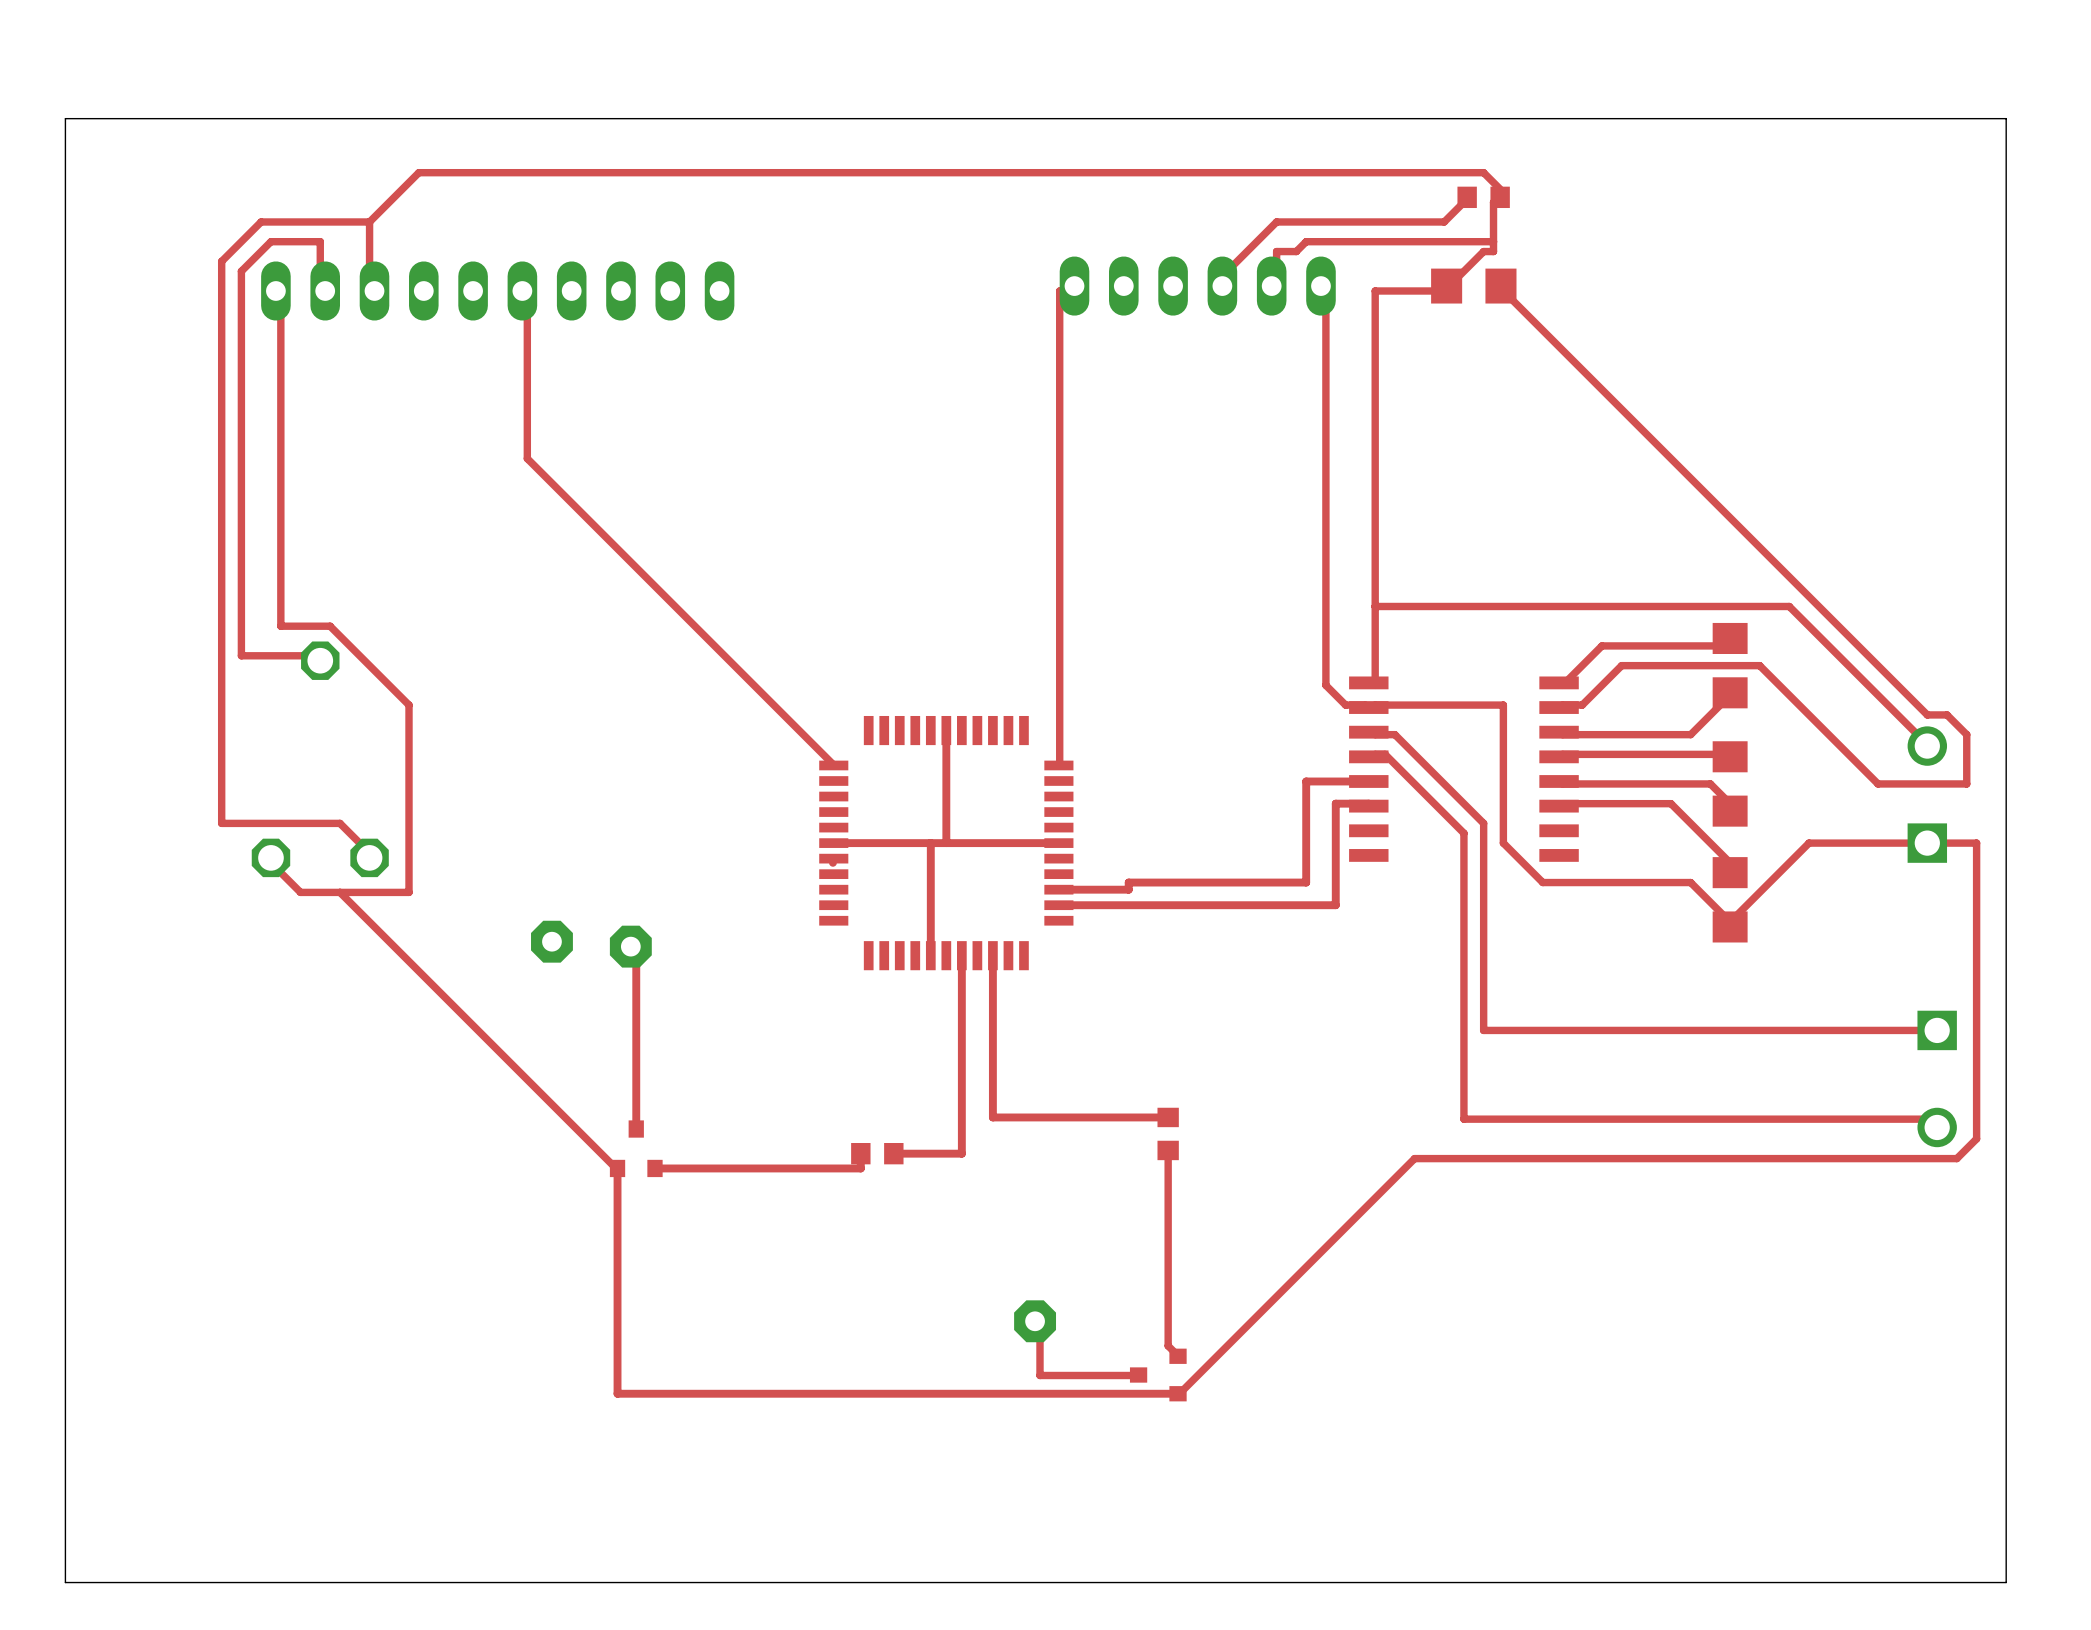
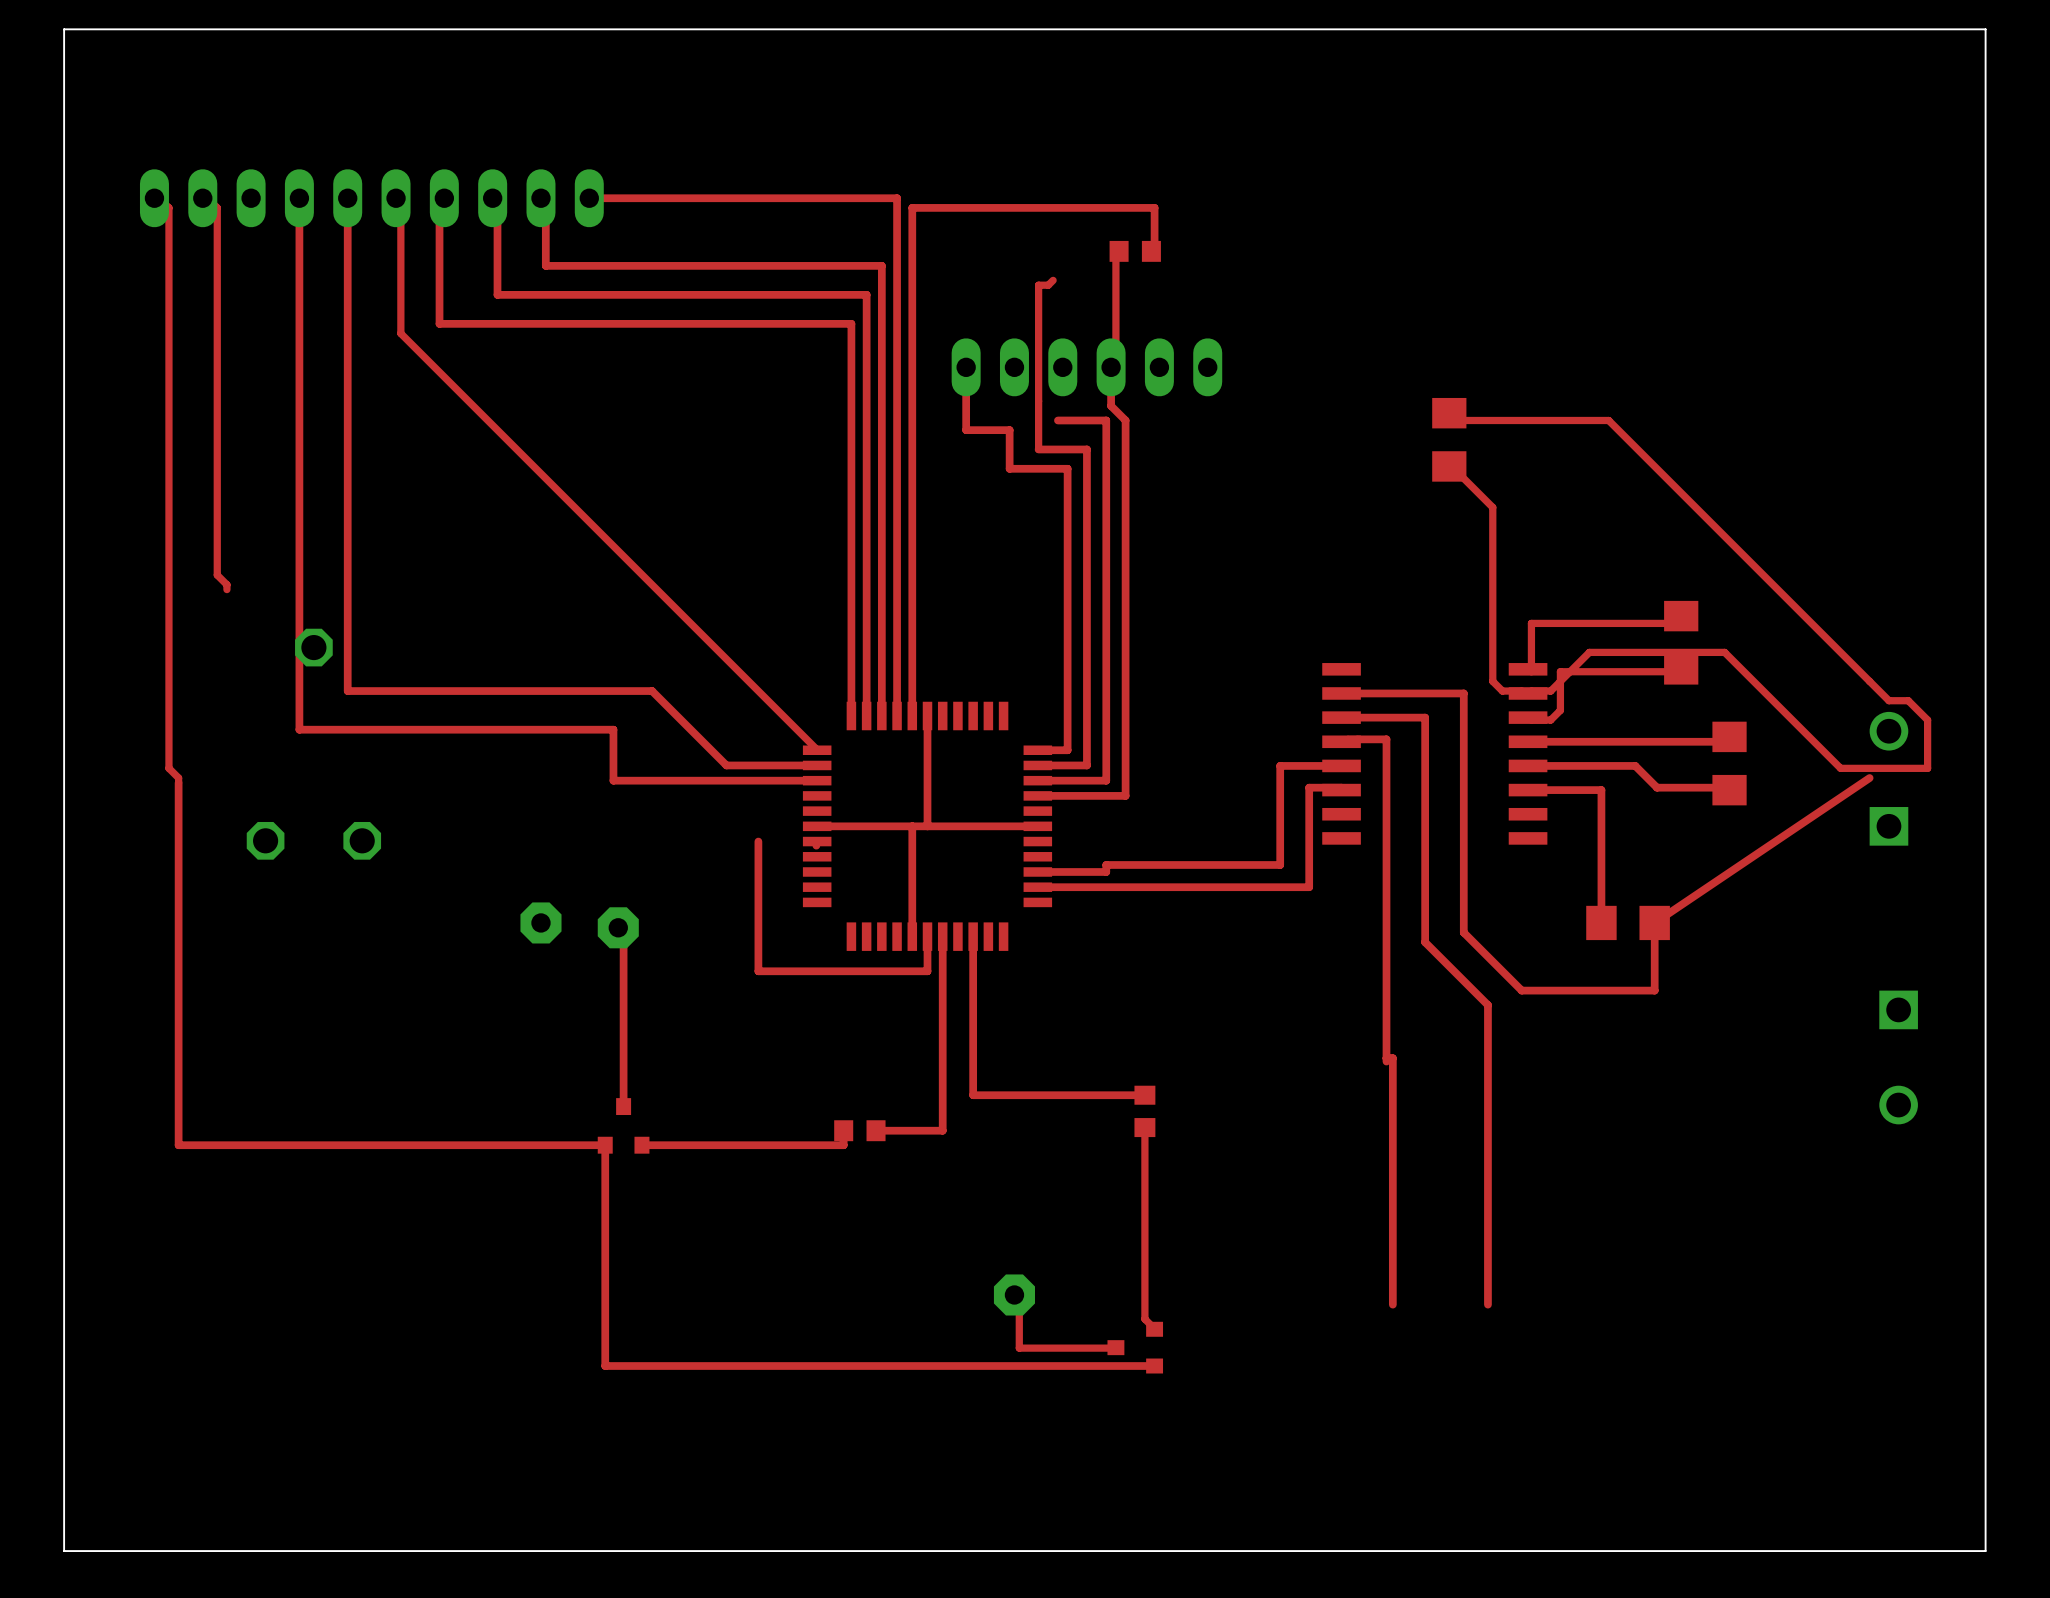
board edge: (65, 118) (2006, 118) (2006, 1582) -> (64, 116) (64, 29) (1985, 29) (1985, 1551) (1966, 1551)
top track: (1467, 197) (1444, 221) (1276, 221) (1217, 281) (1222, 286) -> none
part position: (1483, 197) -> (1135, 251)
top track: none -> (299, 198) (299, 729) (613, 729) (613, 780) (817, 780)
top track: none -> (347, 198) (347, 691) (652, 691) (726, 765) (817, 765)
top track: none -> (444, 198) (439, 198) (439, 323) (851, 323) (851, 716)
top track: none -> (492, 198) (497, 198) (497, 294) (866, 294) (866, 716)
top track: none -> (540, 198) (545, 198) (545, 265) (881, 265) (881, 716)
top track: none -> (589, 198) (897, 198) (897, 716)
top track: (369, 221) (261, 221) (221, 261) -> (202, 198) (207, 198) (217, 207) (217, 256)
top track: (369, 221) (369, 290) (374, 290) -> none
top track: (369, 221) (418, 172) (1483, 172) (1503, 192) (1493, 202) (1493, 251) (1483, 251) (1446, 286) (1444, 290) (1375, 290) (1375, 685) (1368, 682) -> none
top track: (1493, 241) (1306, 241) (1296, 251) (1276, 251) (1276, 281) (1271, 286) -> none
top track: none -> (1119, 251) (1115, 256) (1115, 362) (1111, 367) (1111, 405) (1125, 420) (1125, 795) (1037, 795)
top track: none -> (1151, 251) (1154, 251) (1154, 207) (912, 207) (912, 716)
part position: (1197, 286) -> (1086, 367)
top track: (1320, 286) (1325, 290) (1325, 685) (1345, 705) (1365, 705) (1368, 707) (1375, 705) (1503, 705) (1503, 843) (1542, 882) (1690, 882) (1730, 921) -> none
part rotation: 0° (1473, 286) -> 90° clockwise (1449, 439)
part position: (1473, 286) -> (1449, 439)
top track: (1500, 286) (1503, 290) (1641, 429) -> (1449, 413) (1454, 420) (1608, 420)
top track: (275, 290) (280, 290) (280, 626) (330, 626) (409, 705) (409, 892) (300, 892) (270, 862) (270, 857) -> none
top track: (325, 290) (320, 290) (320, 241) (270, 241) (241, 271) (241, 655) (320, 655) (320, 660) -> none
part position: (497, 290) -> (371, 198)
top track: (522, 290) (527, 290) (527, 458) -> (396, 198) (400, 198) (400, 333) (516, 449)
top track: none -> (966, 367) (966, 430) (1009, 430) (1009, 468) (1067, 468) (1067, 750) (1037, 750)
top track: none -> (1057, 420) (1106, 420) (1106, 780) (1037, 780)
top track: (1059, 458) (1058, 765) -> (1038, 449) (1086, 449) (1086, 765) (1037, 765)
top track: none -> (1449, 466) (1454, 468) (1492, 507) (1492, 681) (1502, 691) (1521, 691) (1528, 693)
top track: (221, 586) (221, 823) (339, 823) (369, 852) (369, 857) -> (217, 575) (226, 584) (226, 589)
top track: (1375, 606) (1789, 606) (1927, 746) -> none
top track: (1730, 638) (1730, 645) (1601, 645) (1562, 685) -> (1681, 616) (1676, 623) (1531, 623) (1531, 671)
part position: (1730, 665) -> (1681, 642)
top track: (1730, 692) (1730, 695) (1690, 734) (1582, 734) -> (1681, 669) (1676, 671) (1560, 671) (1560, 710) (1550, 720)
top track: none -> (1341, 693) (1463, 693) (1463, 932) (1521, 990) (1654, 990) (1654, 922) (1869, 778)
top track: (1368, 732) (1375, 734) (1394, 734) (1483, 823) (1483, 1030) (1937, 1030) -> (1341, 717) (1425, 717) (1425, 942) (1487, 1005) (1487, 1304)
top track: (1385, 754) (1463, 833) (1463, 1119) (1937, 1119) (1937, 1127) -> (1357, 739) (1386, 739) (1386, 1061)
top track: (1730, 756) (1730, 754) (1562, 754) (1559, 756) -> (1729, 736) (1724, 741) (1528, 741)
top track: (1559, 781) (1562, 783) (1710, 783) (1730, 803) (1730, 811) -> (1528, 765) (1635, 765) (1657, 787) (1727, 787) (1729, 790)
part position: (1730, 783) -> (1729, 763)
top track: (1559, 806) (1562, 803) (1670, 803) (1730, 862) (1730, 872) -> (1528, 790) (1601, 790) (1601, 922)
top track: none -> (758, 841) (758, 971) (927, 971) (927, 936)
top track: (339, 892) (616, 1168) -> (154, 198) (159, 198) (168, 207) (168, 768) (178, 778) (178, 1145) (603, 1145)
part: (1730, 899) -> none
top track: (1730, 921) (1809, 843) (1976, 843) (1976, 1138) (1956, 1158) (1414, 1158) (1178, 1393) -> none
part: none -> (1628, 922)
top track: none -> (1386, 1058) (1392, 1058) (1392, 1304)

